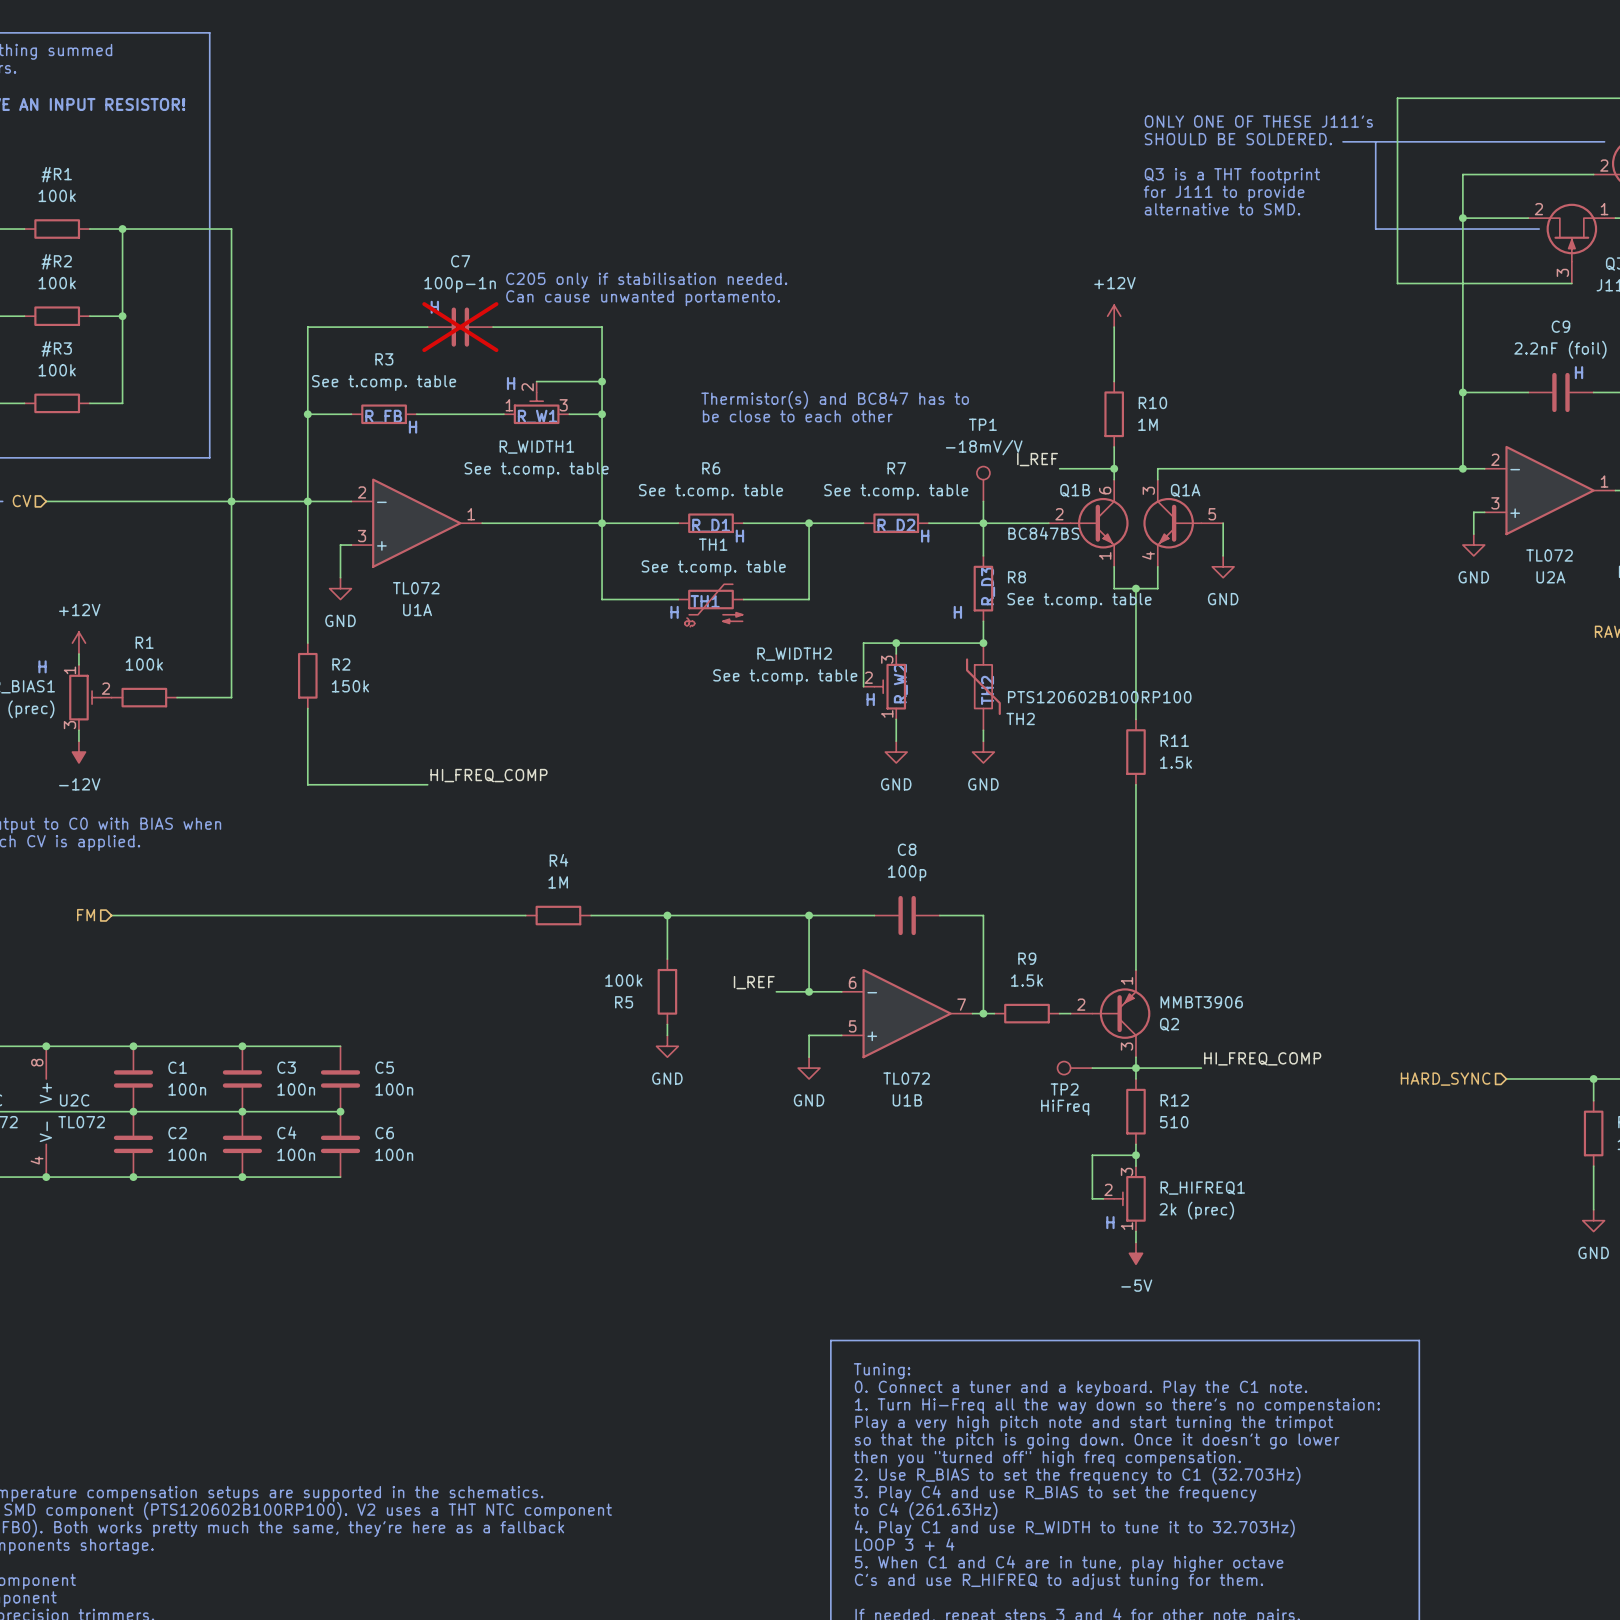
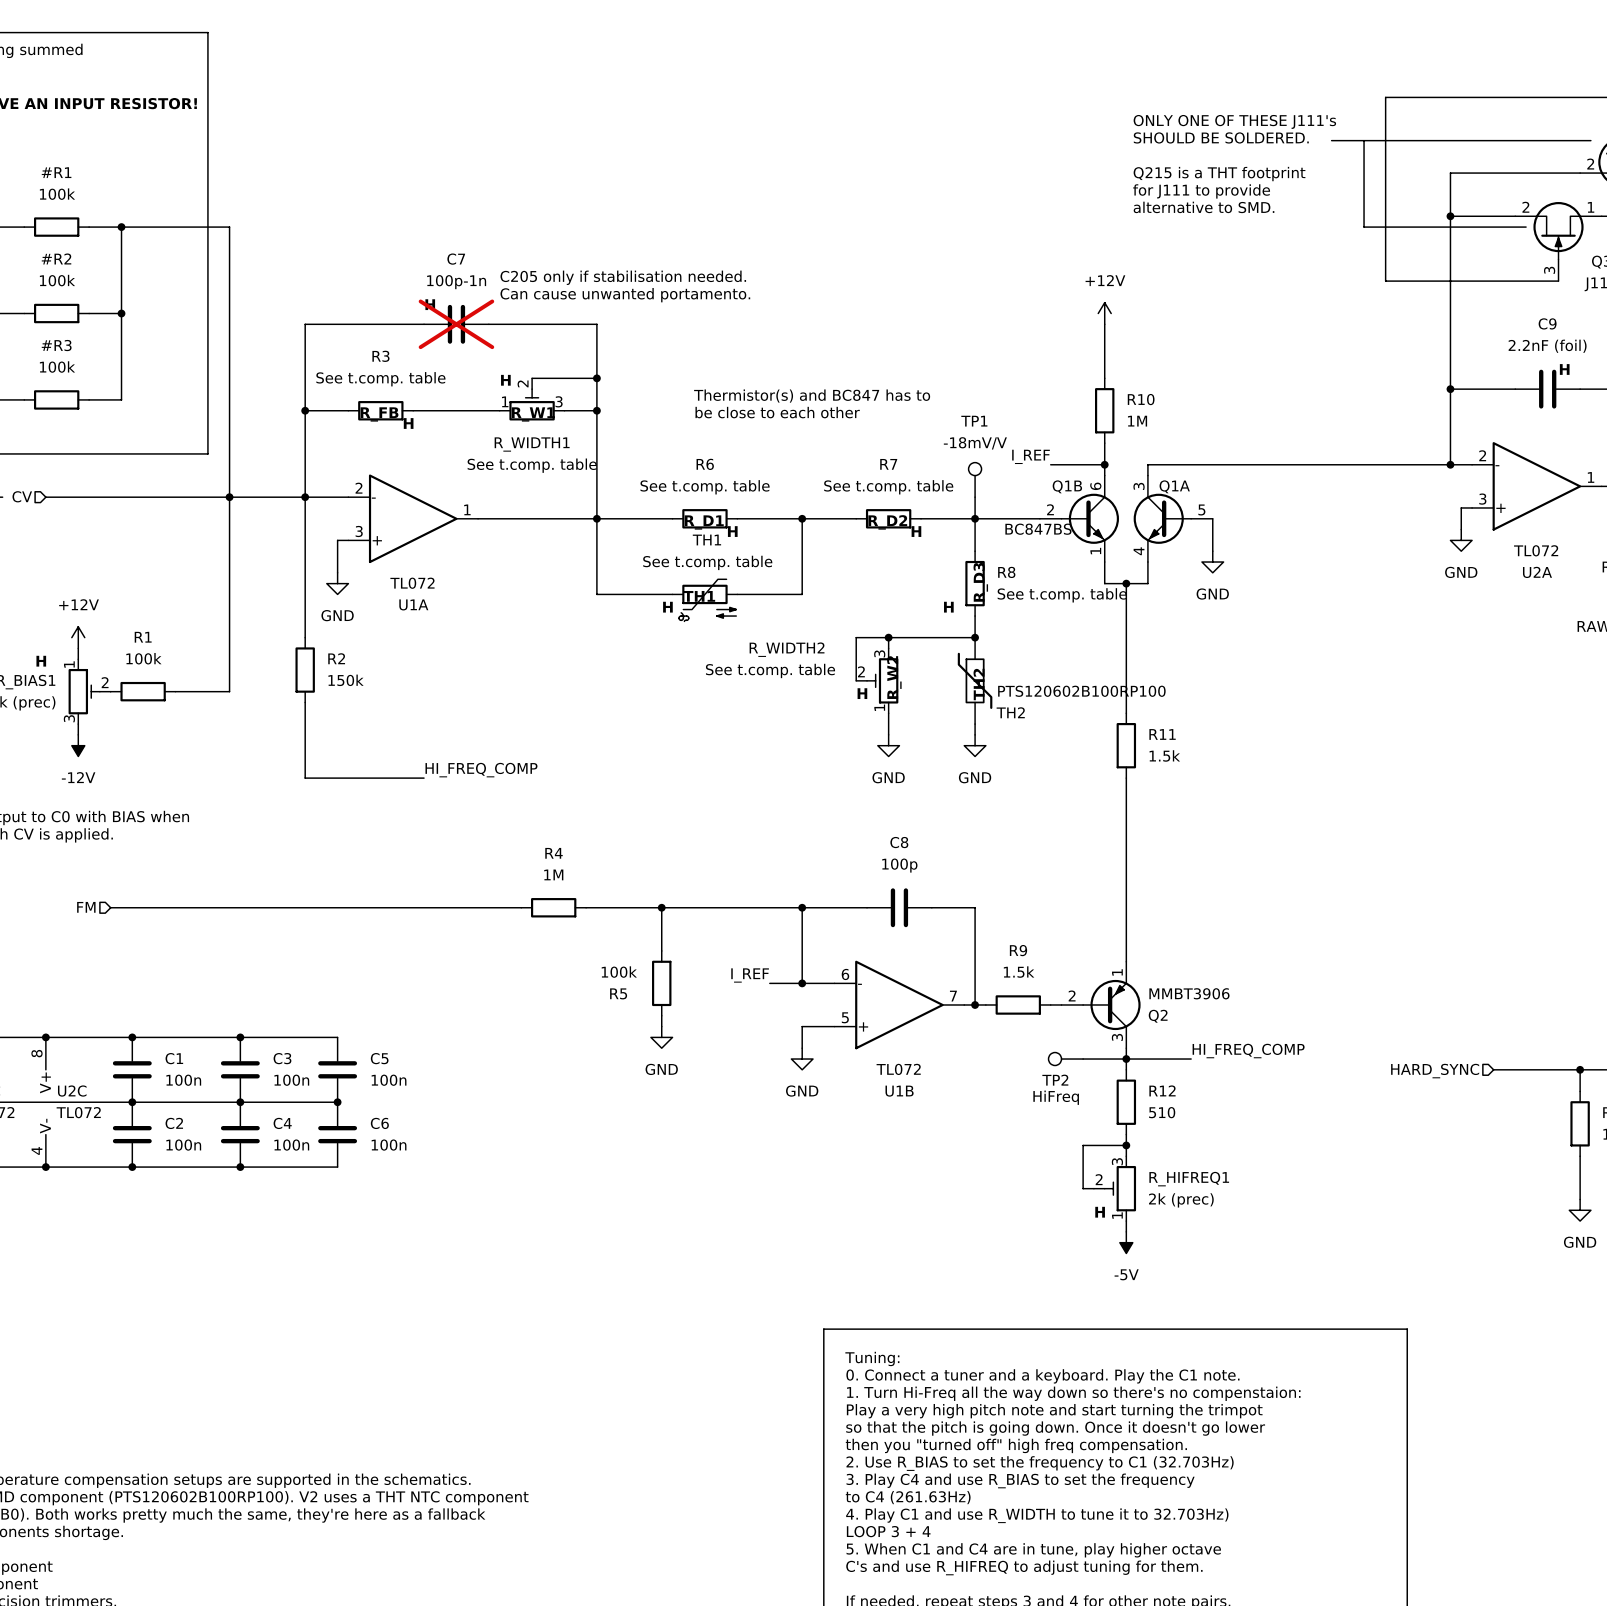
text: Q3 is a THT footprint (1232, 176) -> Q215 is a THT footprint (1219, 174)

